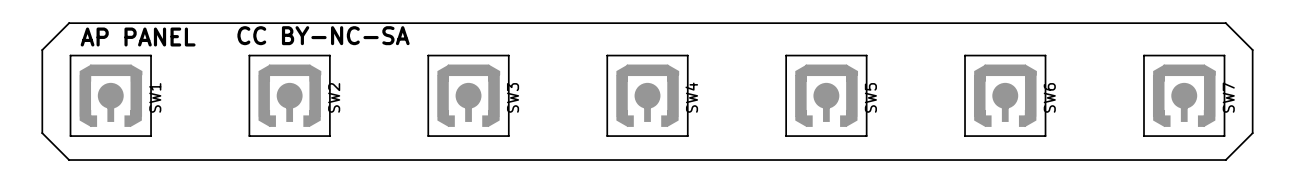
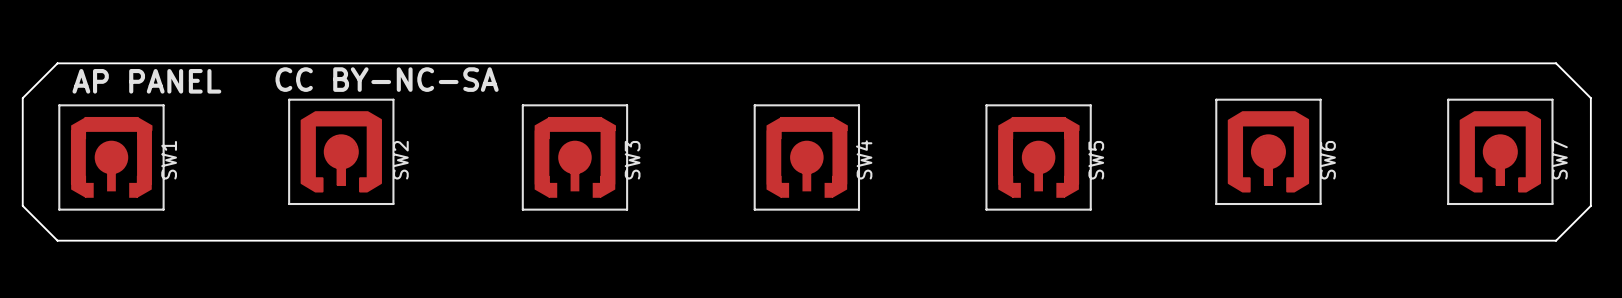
SW2 footprint: [248, 54, 331, 137] -> [288, 98, 395, 206]
SW6 footprint: [964, 54, 1047, 137] -> [1215, 98, 1322, 206]
SW7 footprint: [1143, 54, 1226, 137] -> [1447, 98, 1554, 206]

